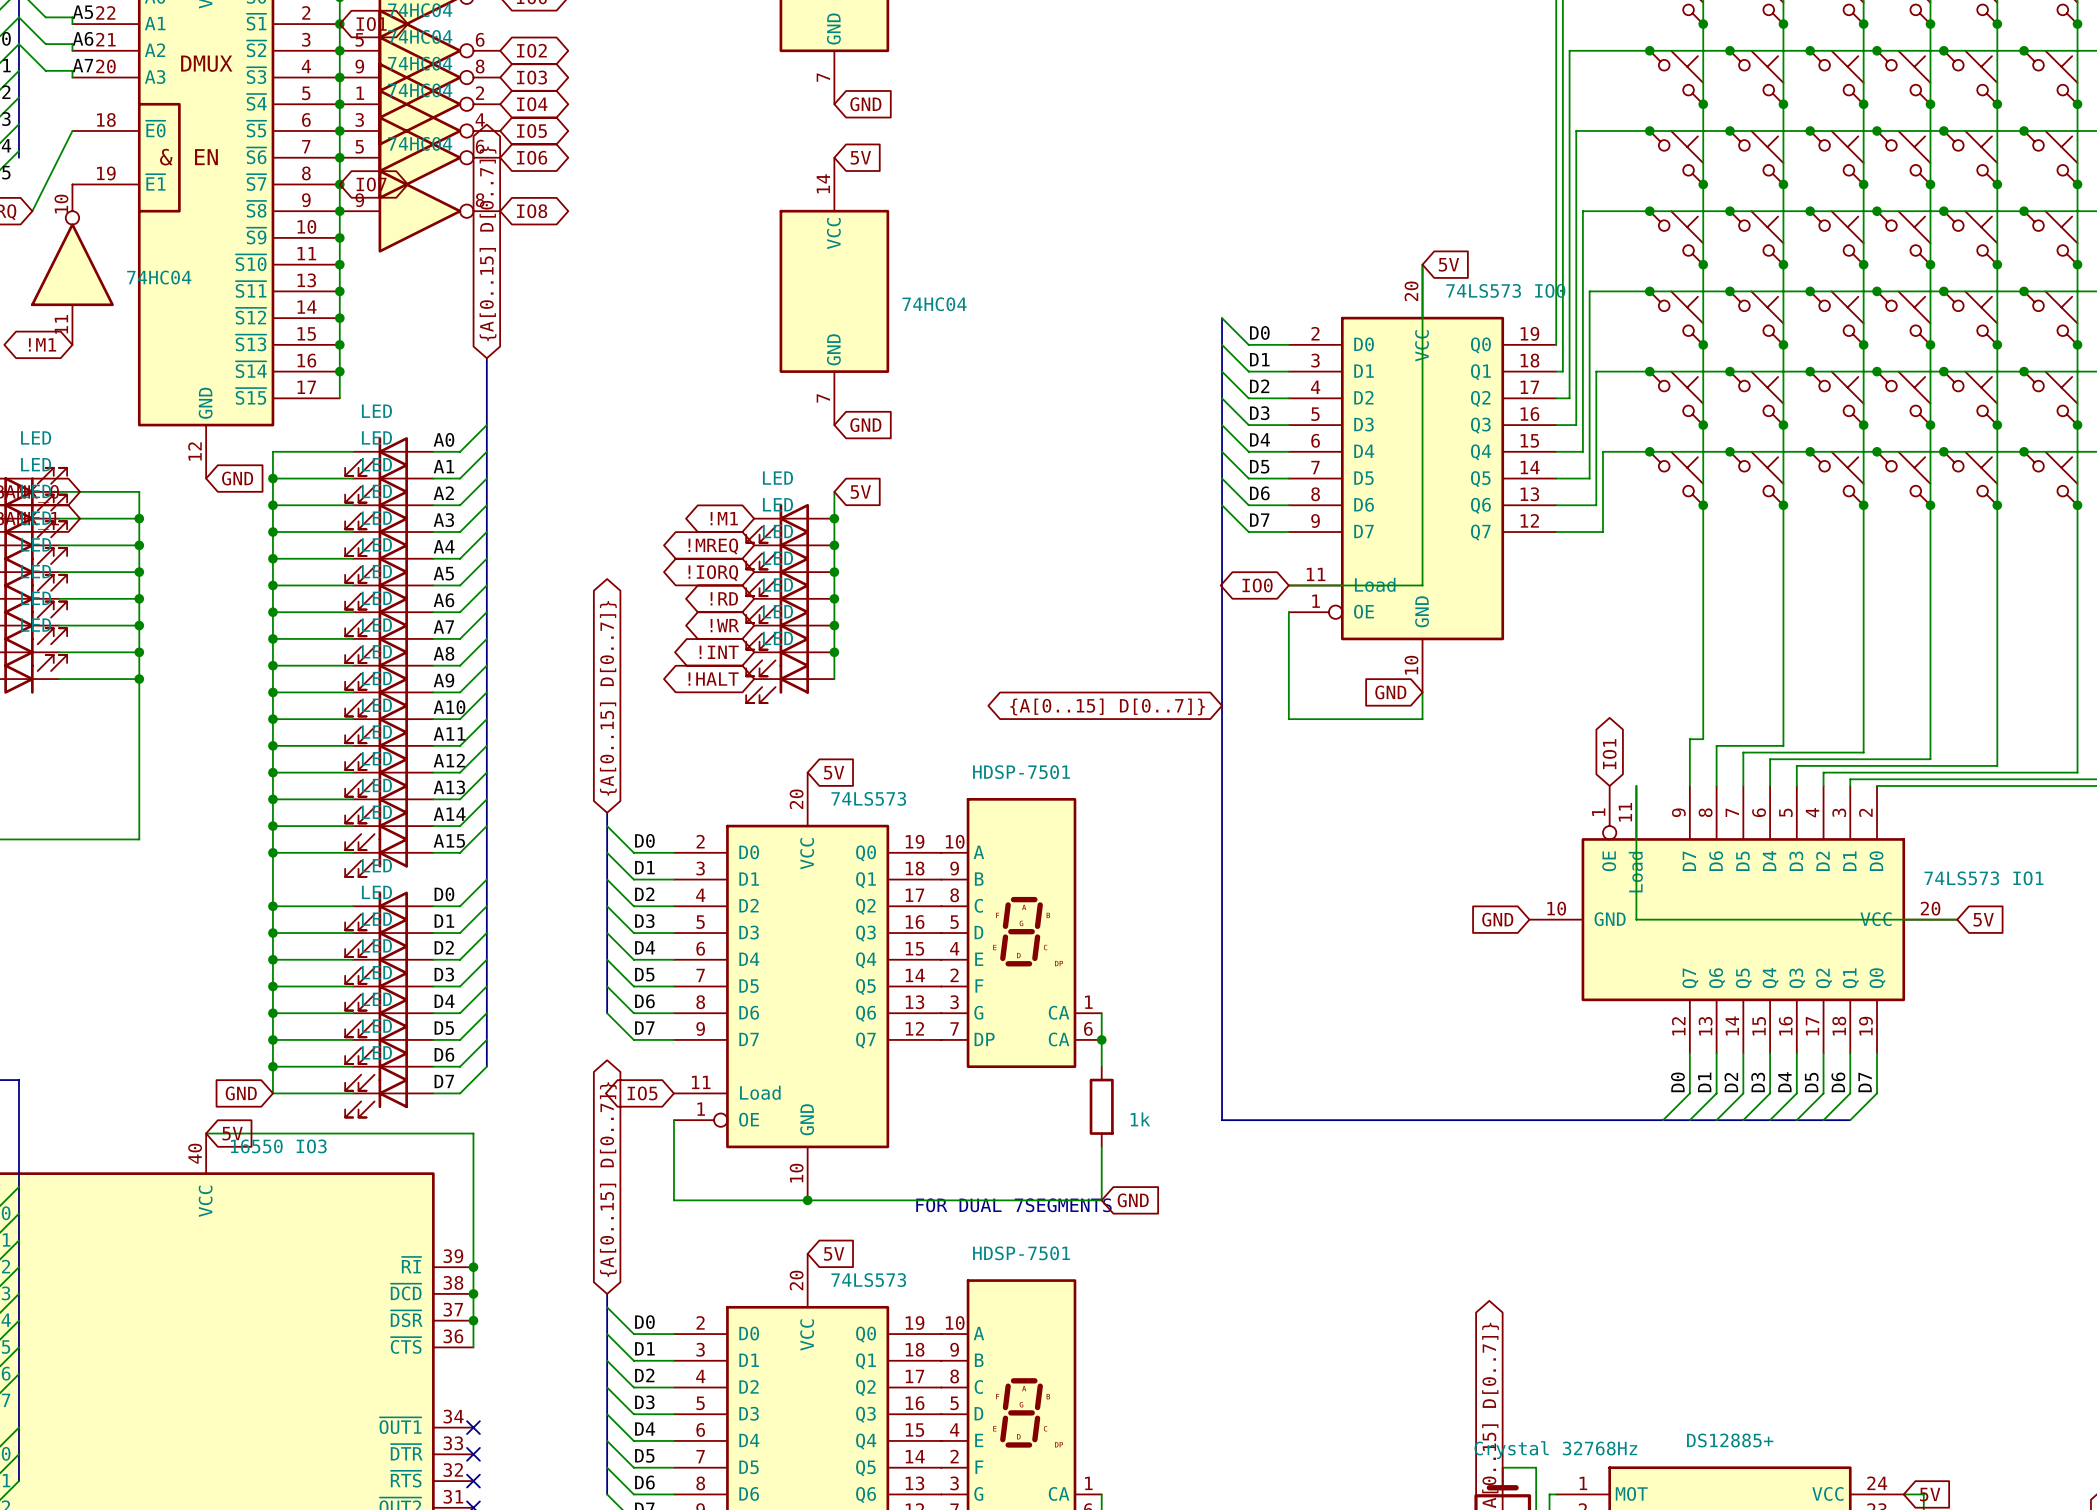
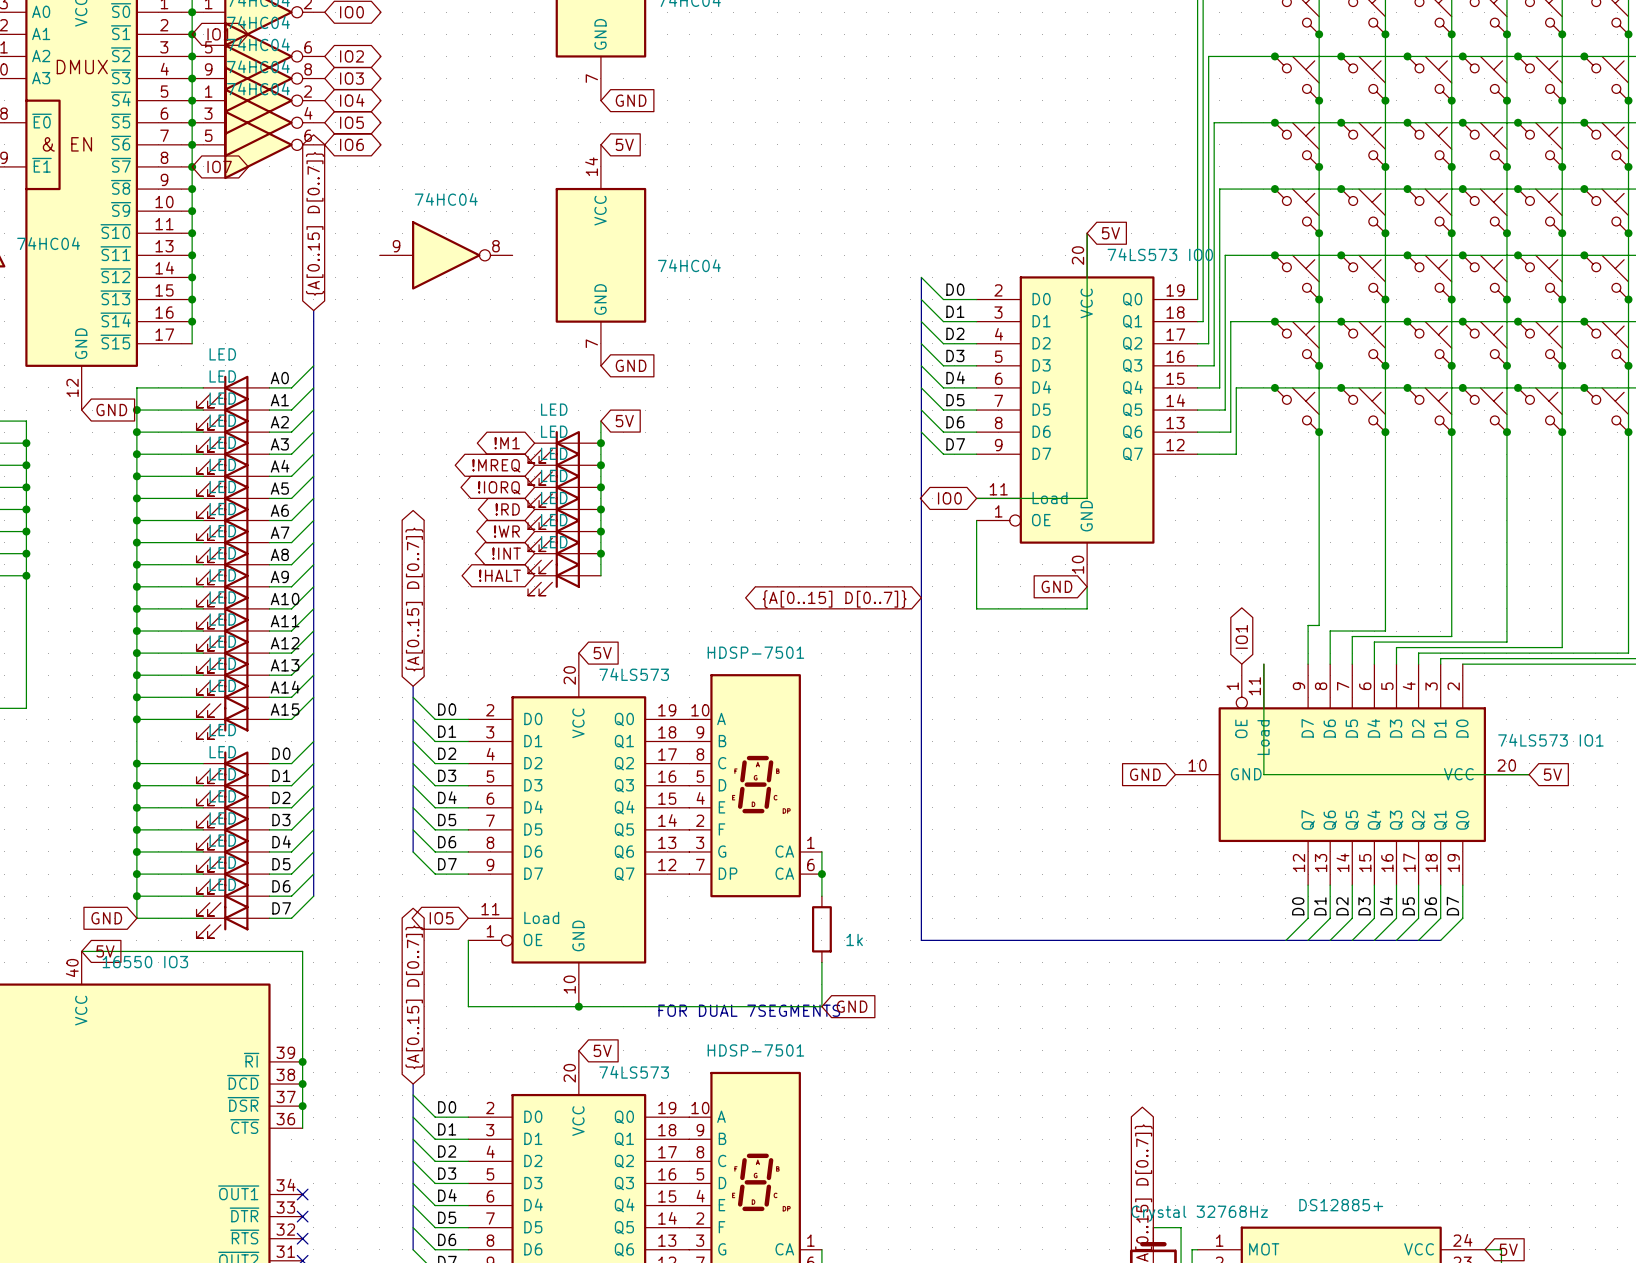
part position: (419, 211) -> (446, 255)
global label: IO8 (532, 211) -> none

